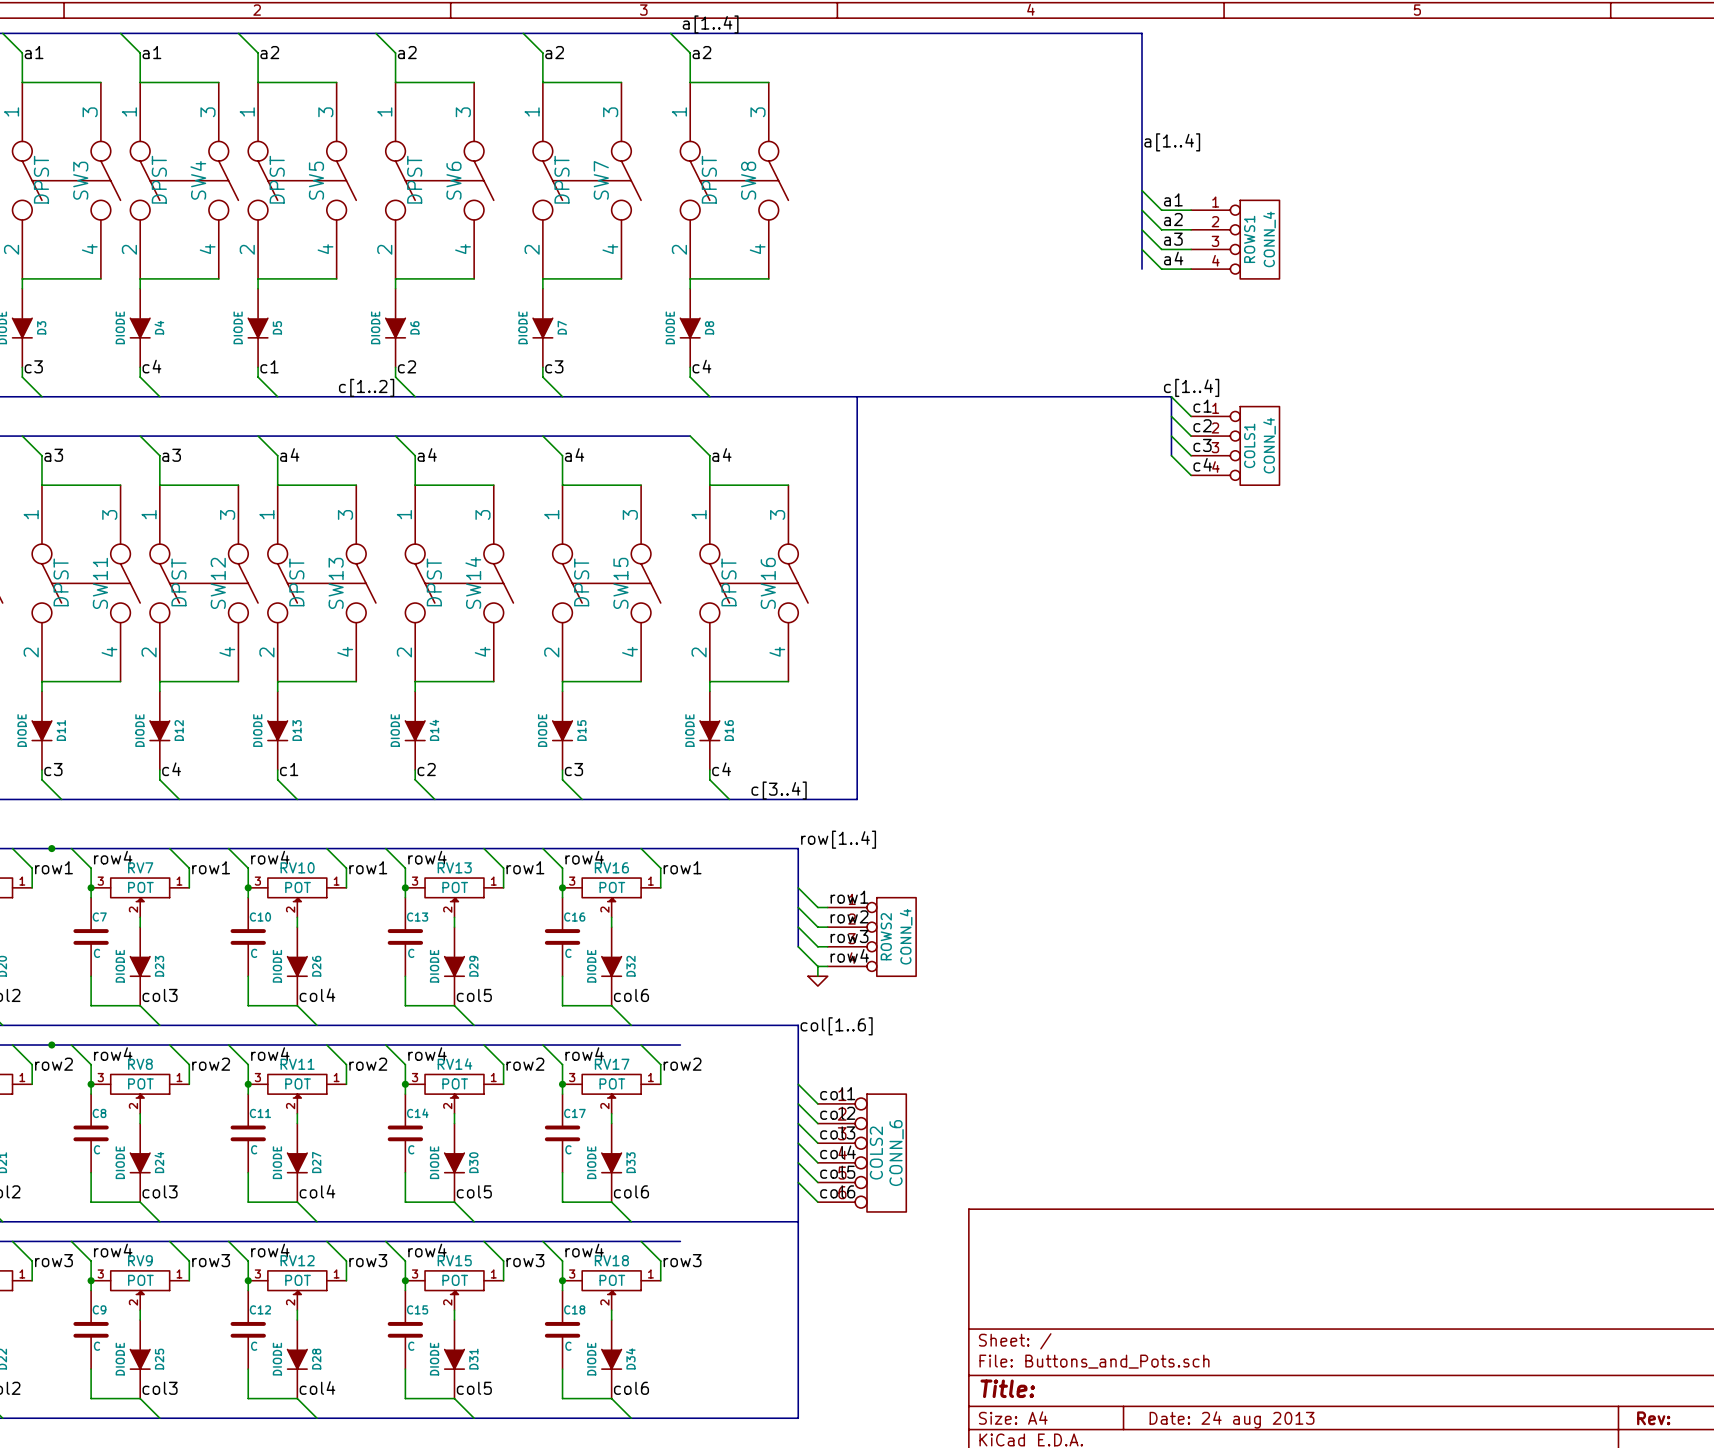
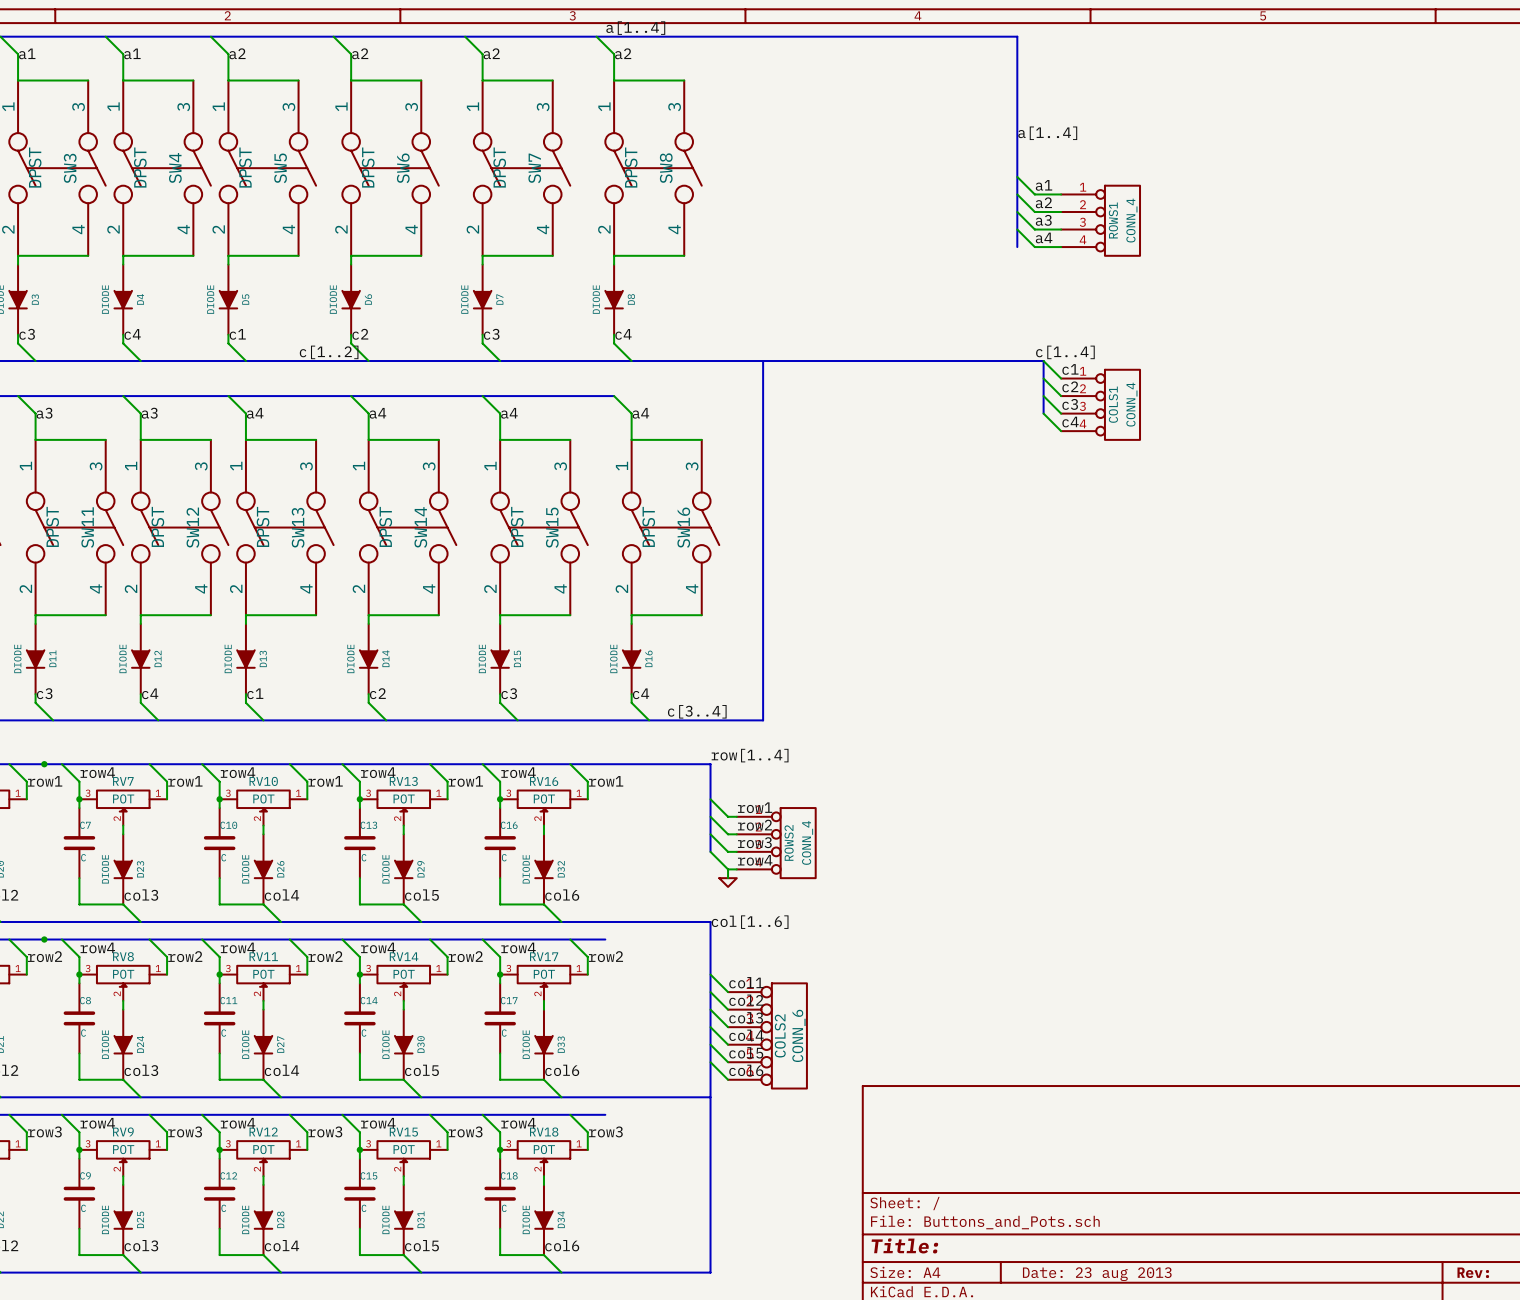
title block: Date: 24 aug 2013 (1232, 1419) -> Date: 23 aug 2013 (1097, 1274)

